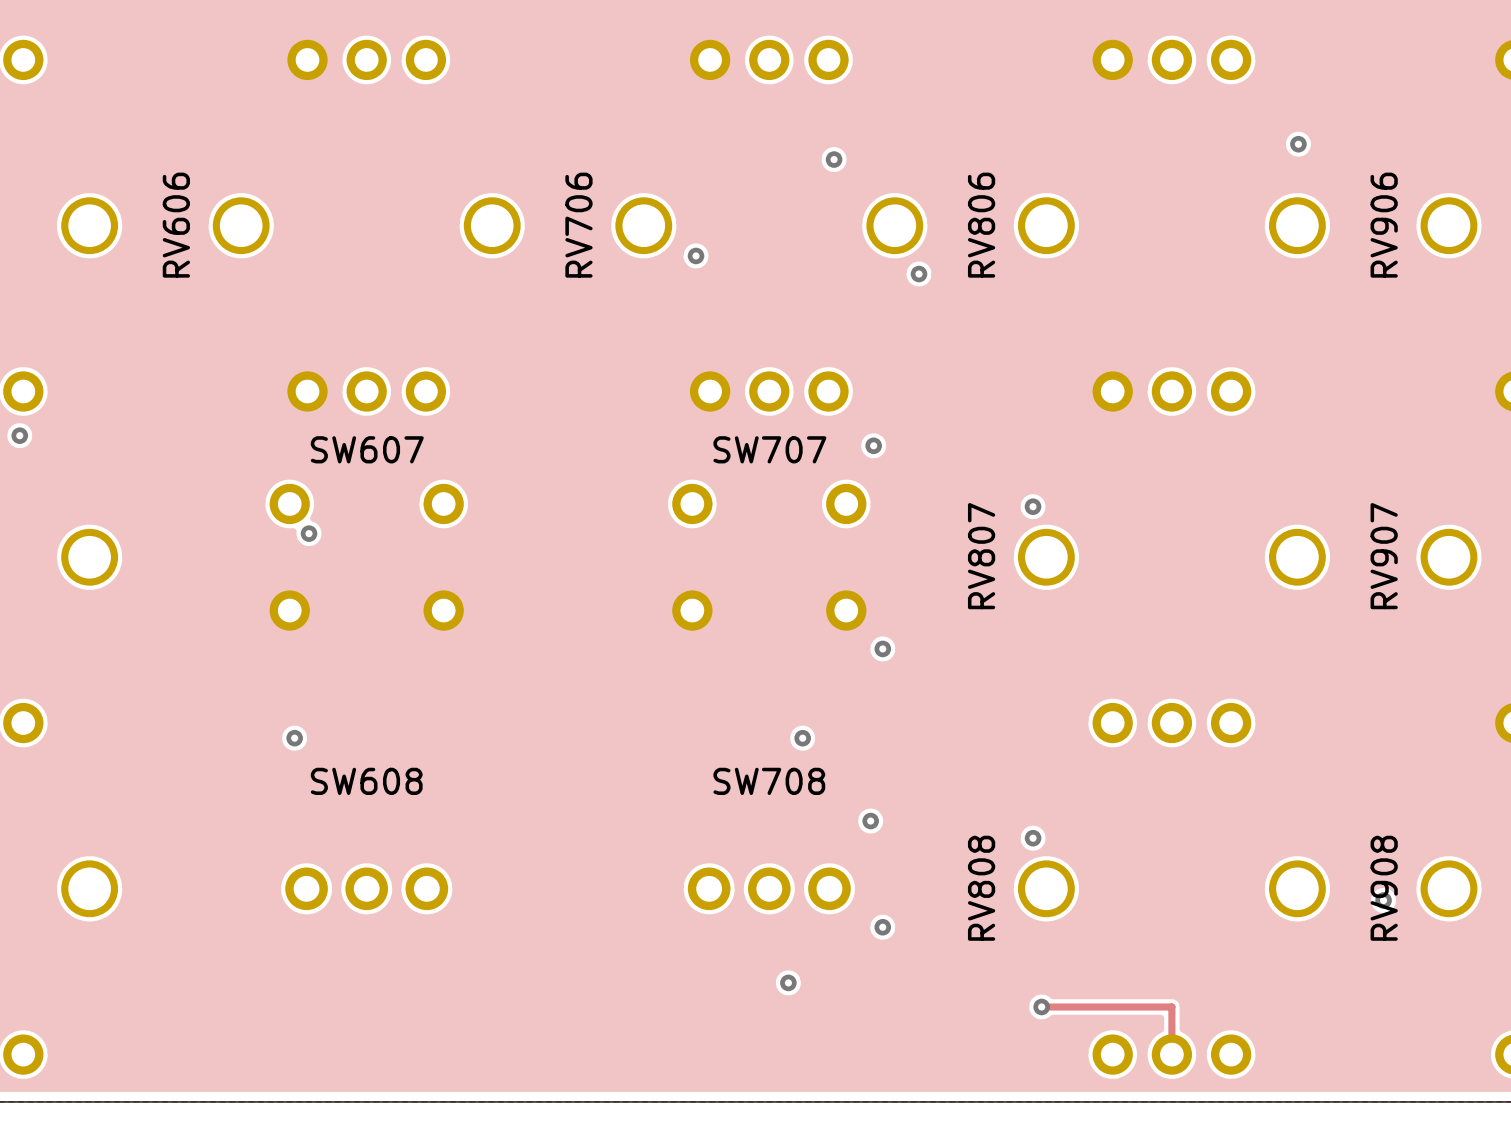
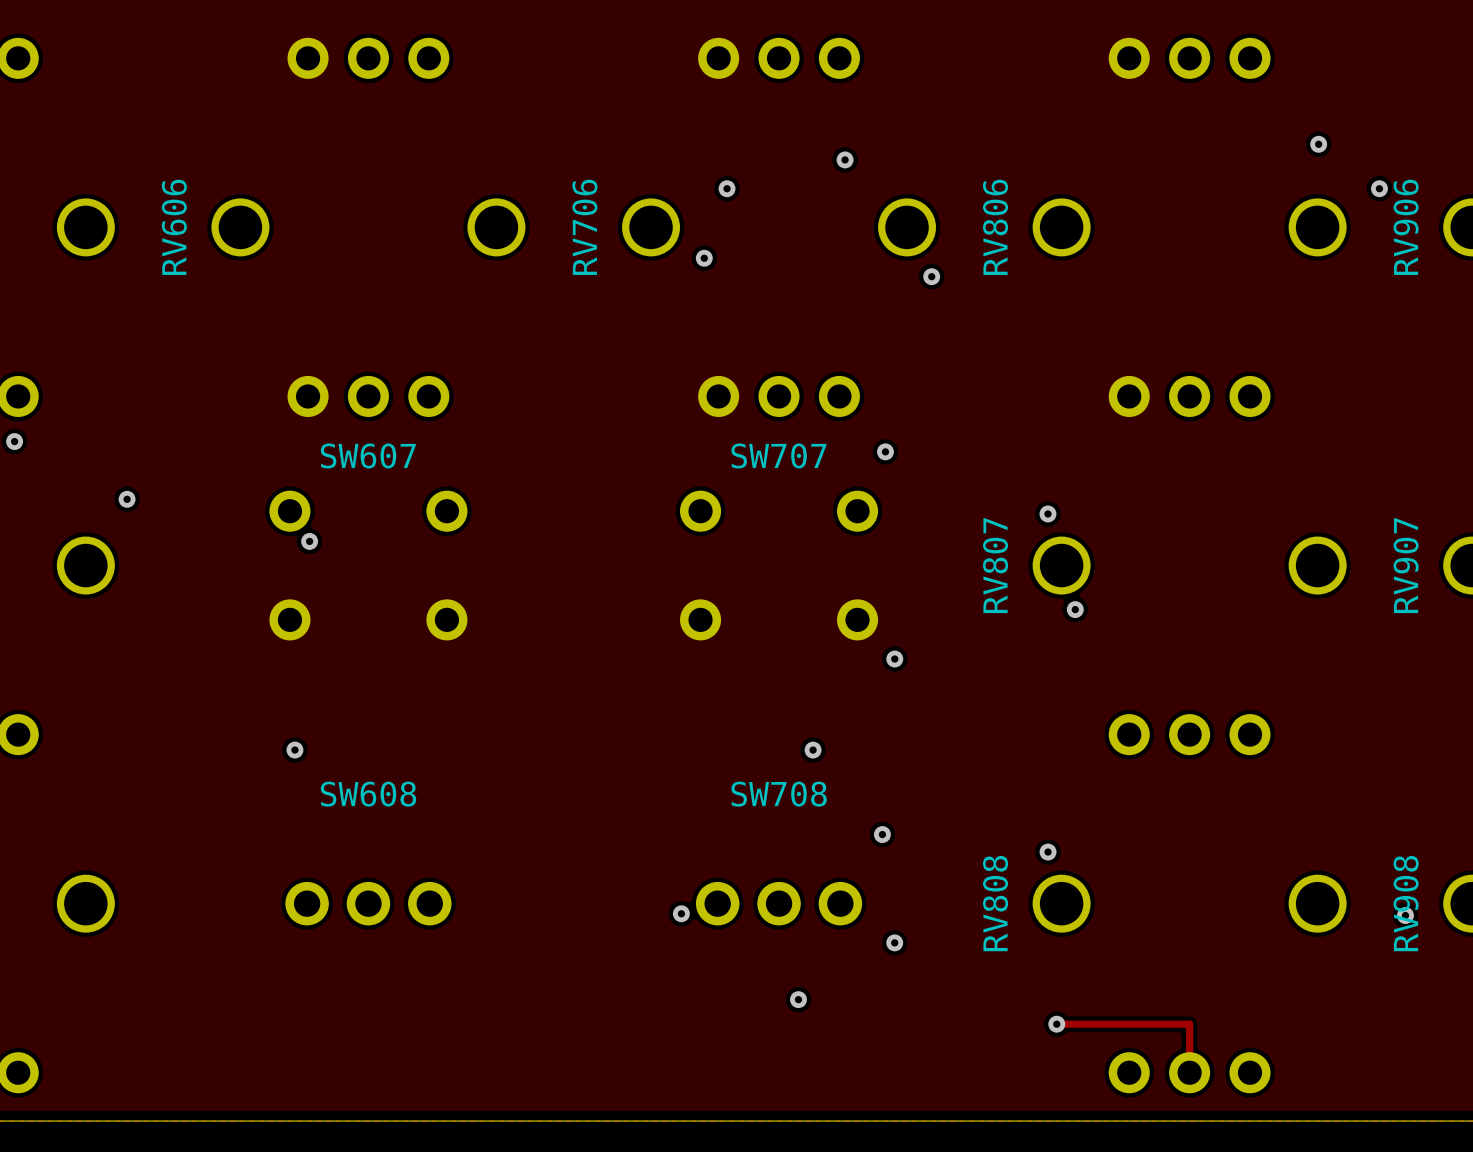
via: none -> (727, 188)
via: none -> (1379, 188)
via: none -> (127, 499)
via: none -> (1075, 609)
via: none -> (681, 913)

